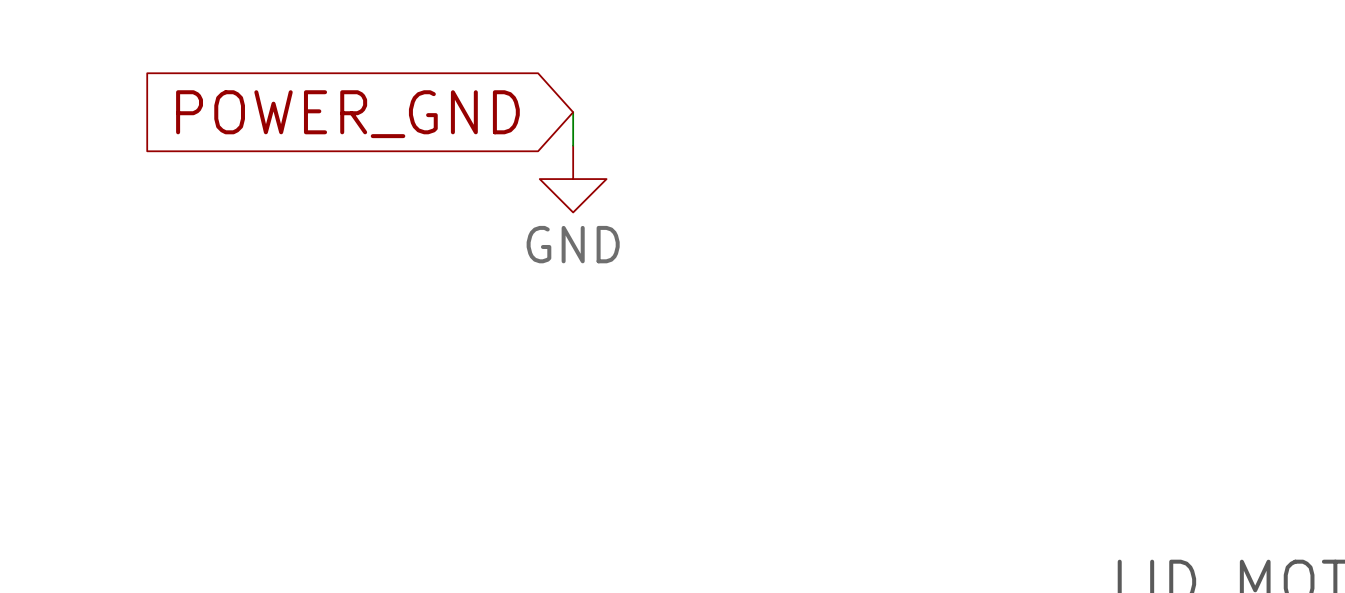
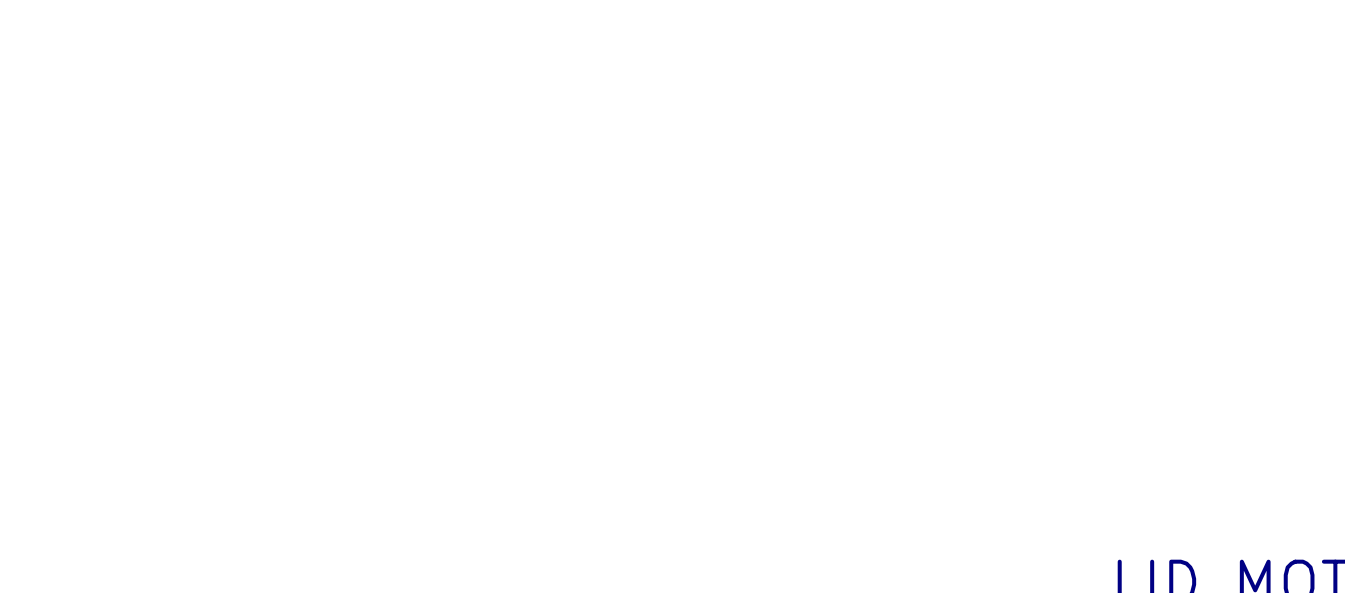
wire: (573, 112) (573, 145) -> none
global label: POWER_GND (347, 114) -> none
power symbol: GND (573, 179) -> none

